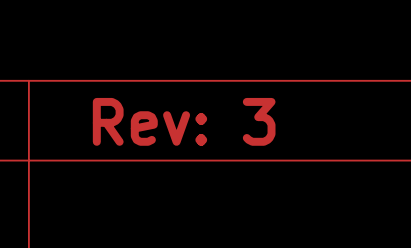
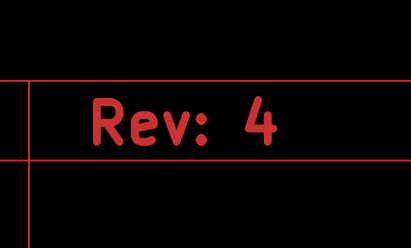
title block: Rev: 3 (184, 121) -> Rev: 4 (185, 120)

